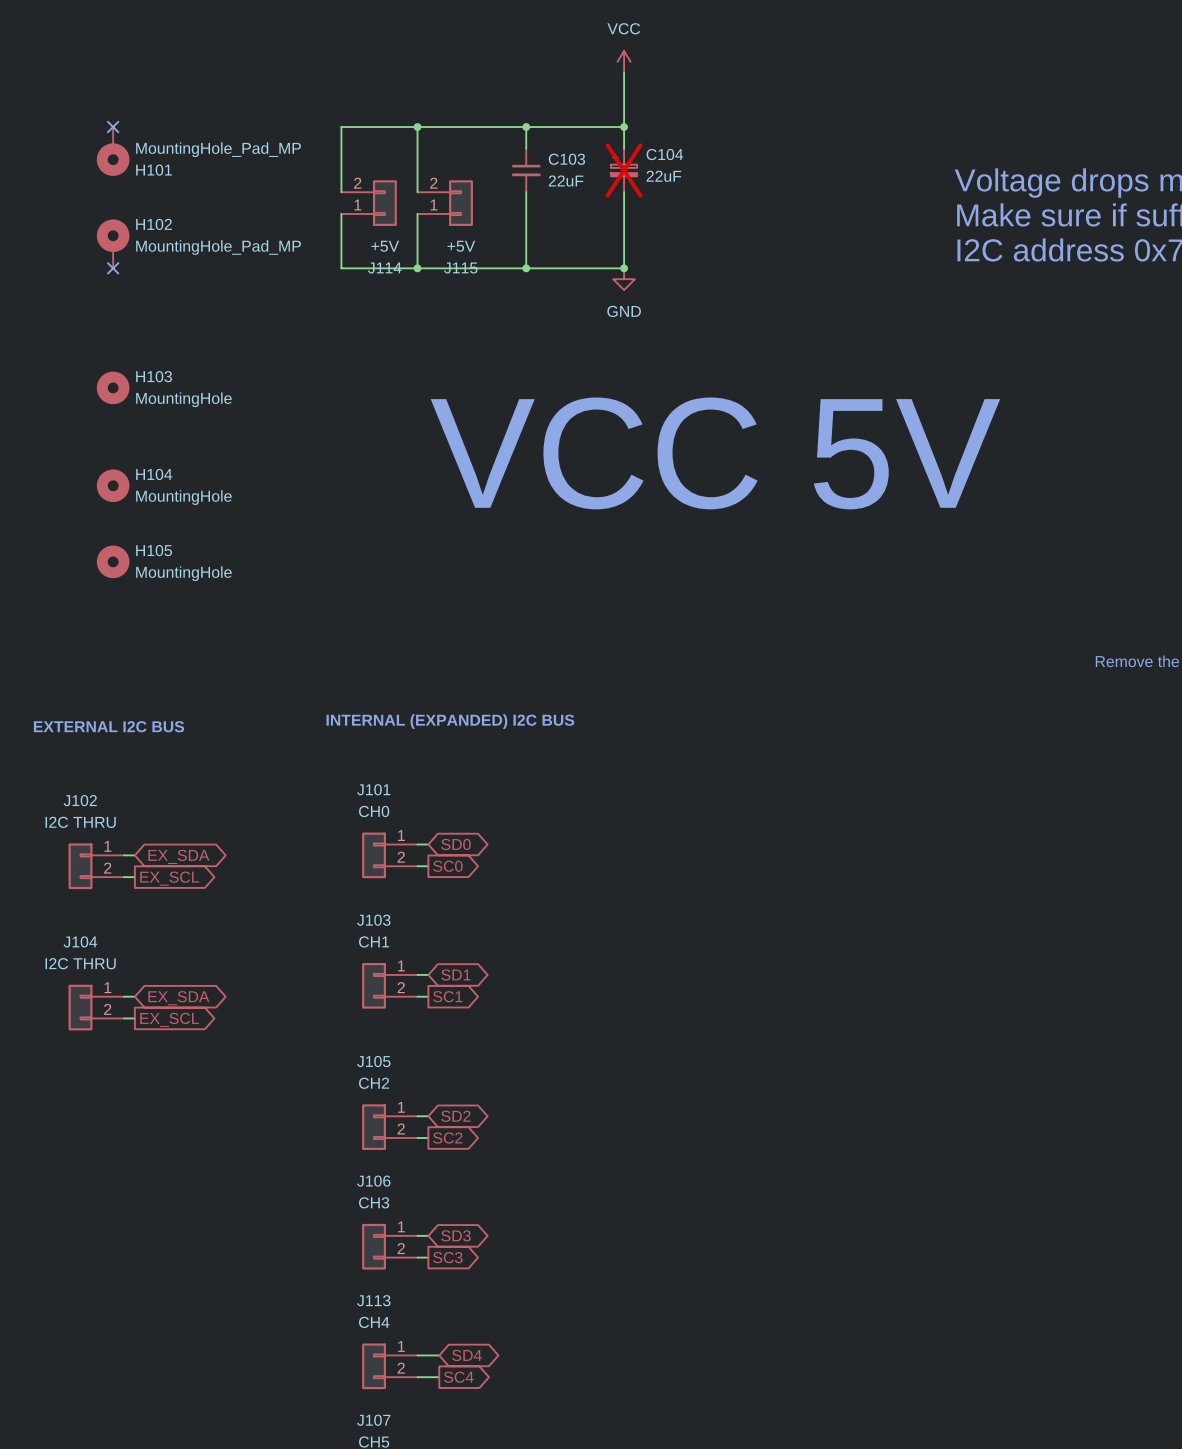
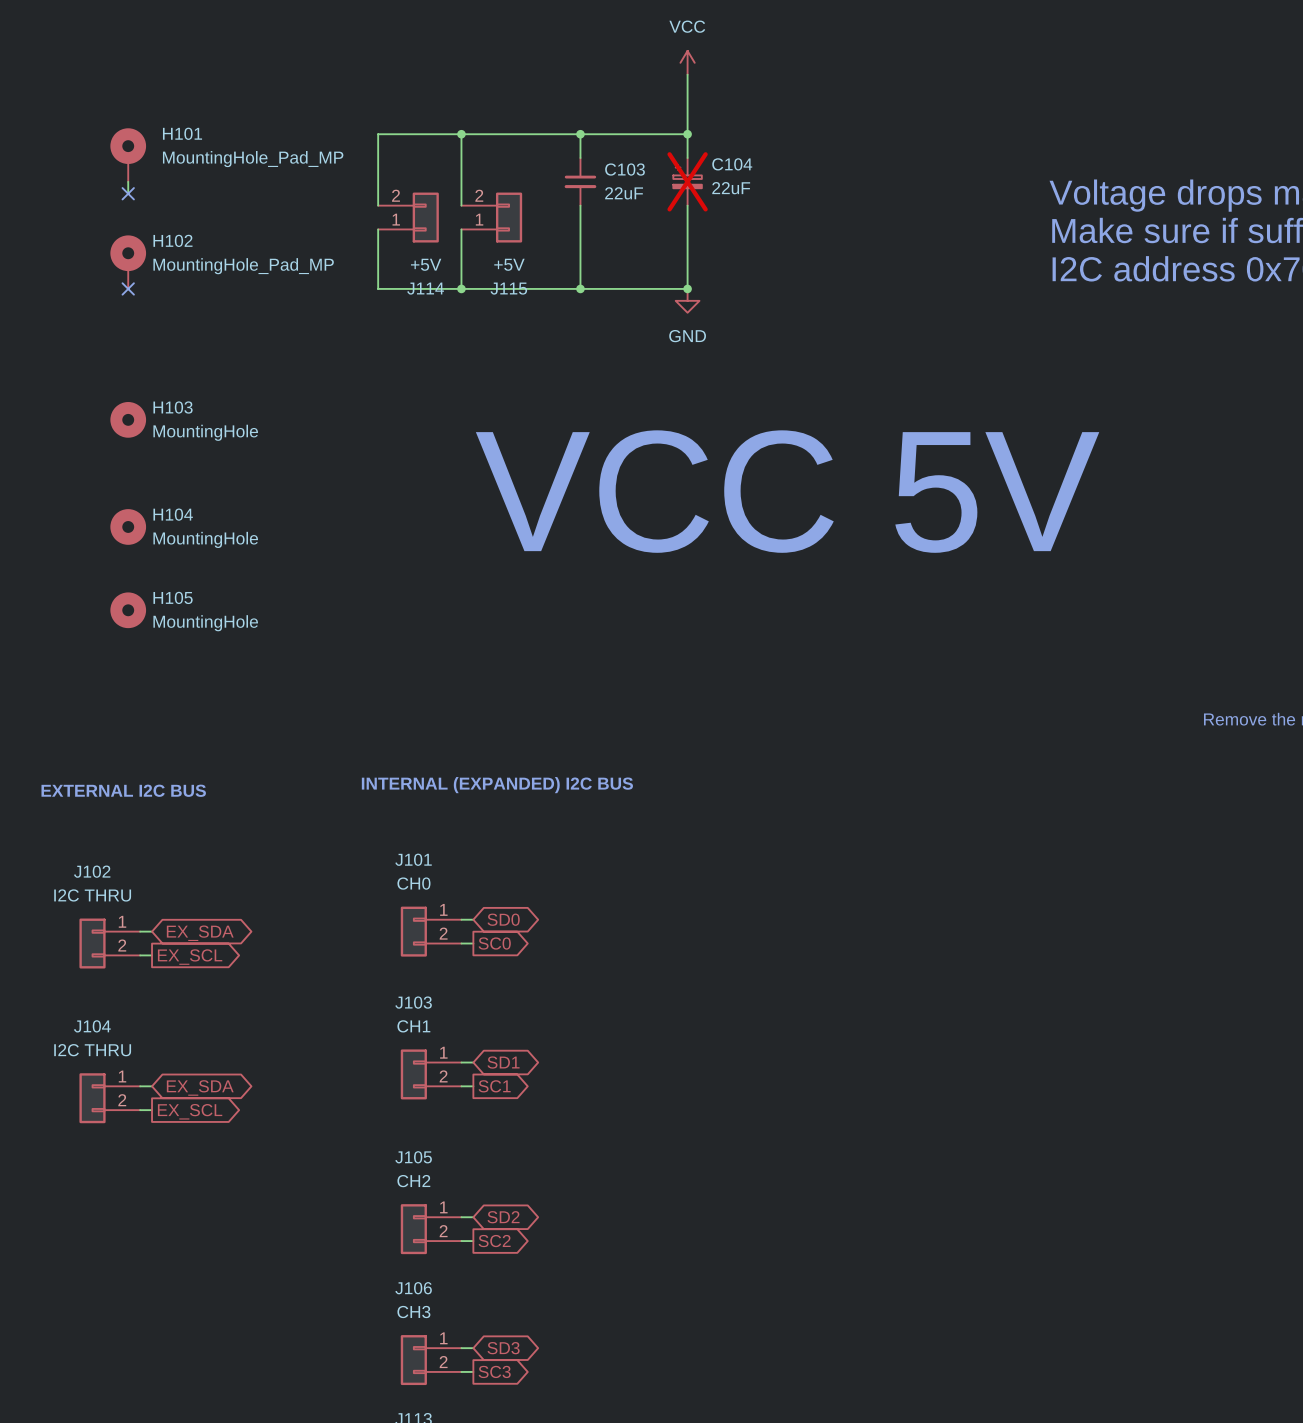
no-connect mark: (113, 127) -> none
H101 rotation: 0° (113, 159) -> 180° (128, 146)
wire: none -> (128, 181) (128, 193)
H101 name position: H101 (154, 170) -> H101 (182, 133)
no-connect mark: none -> (128, 193)

